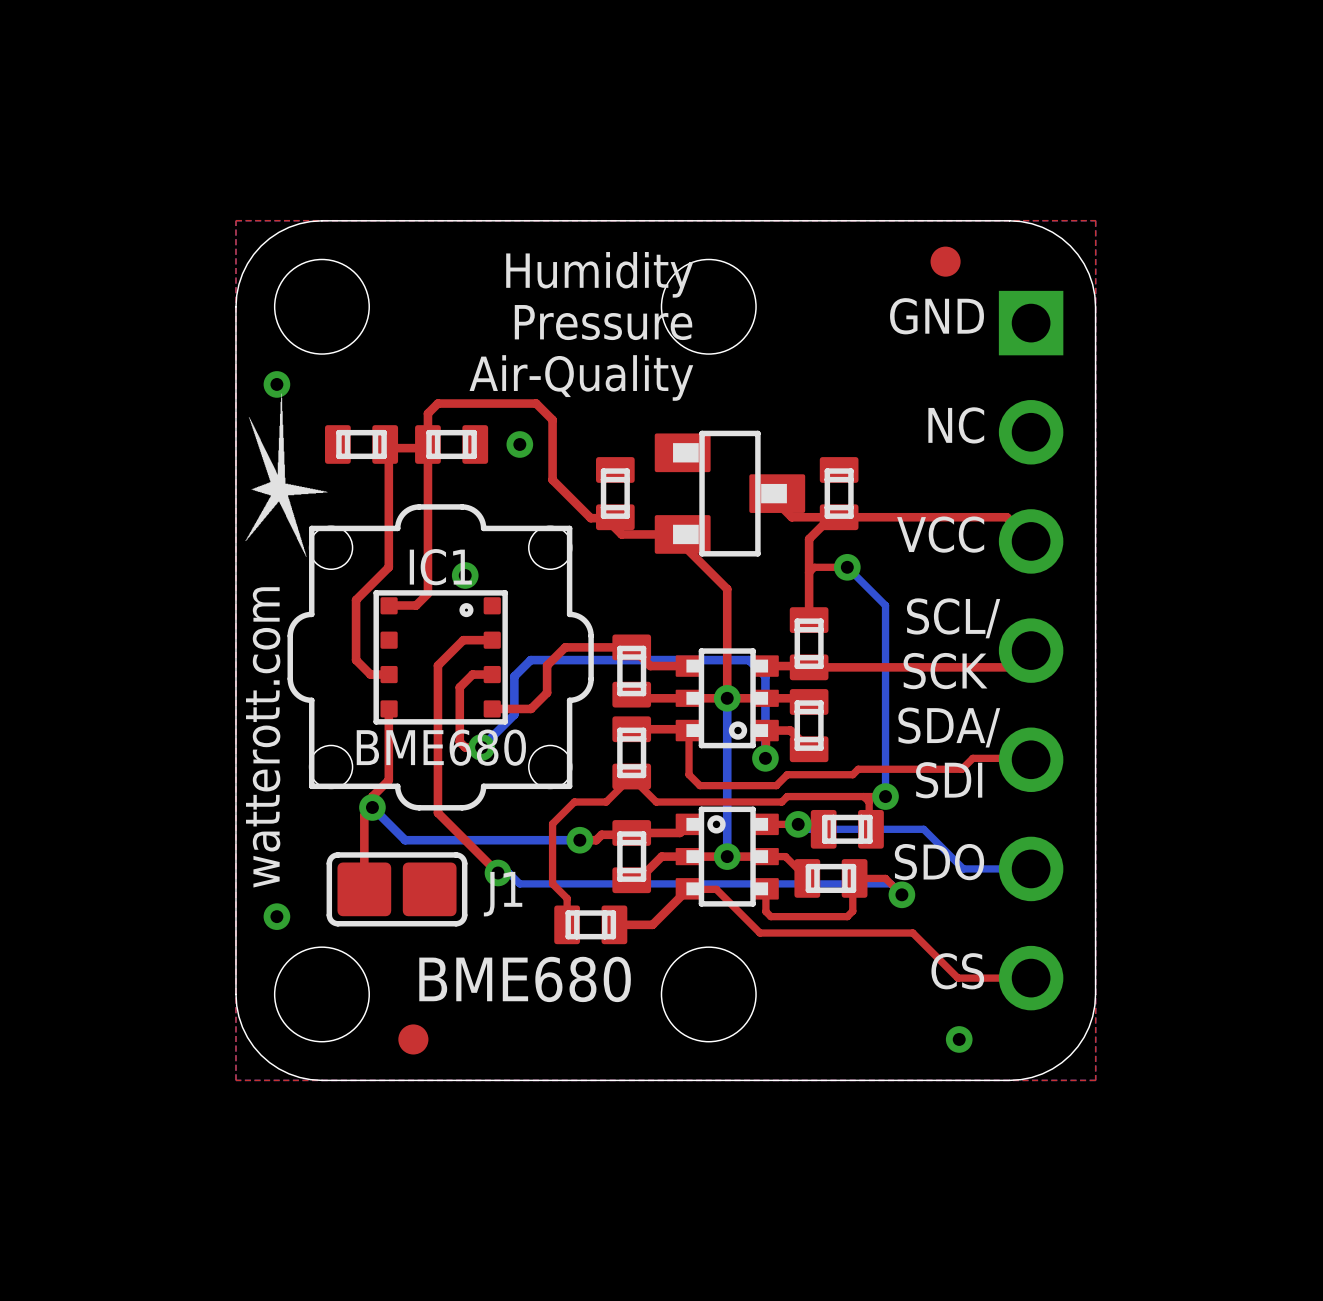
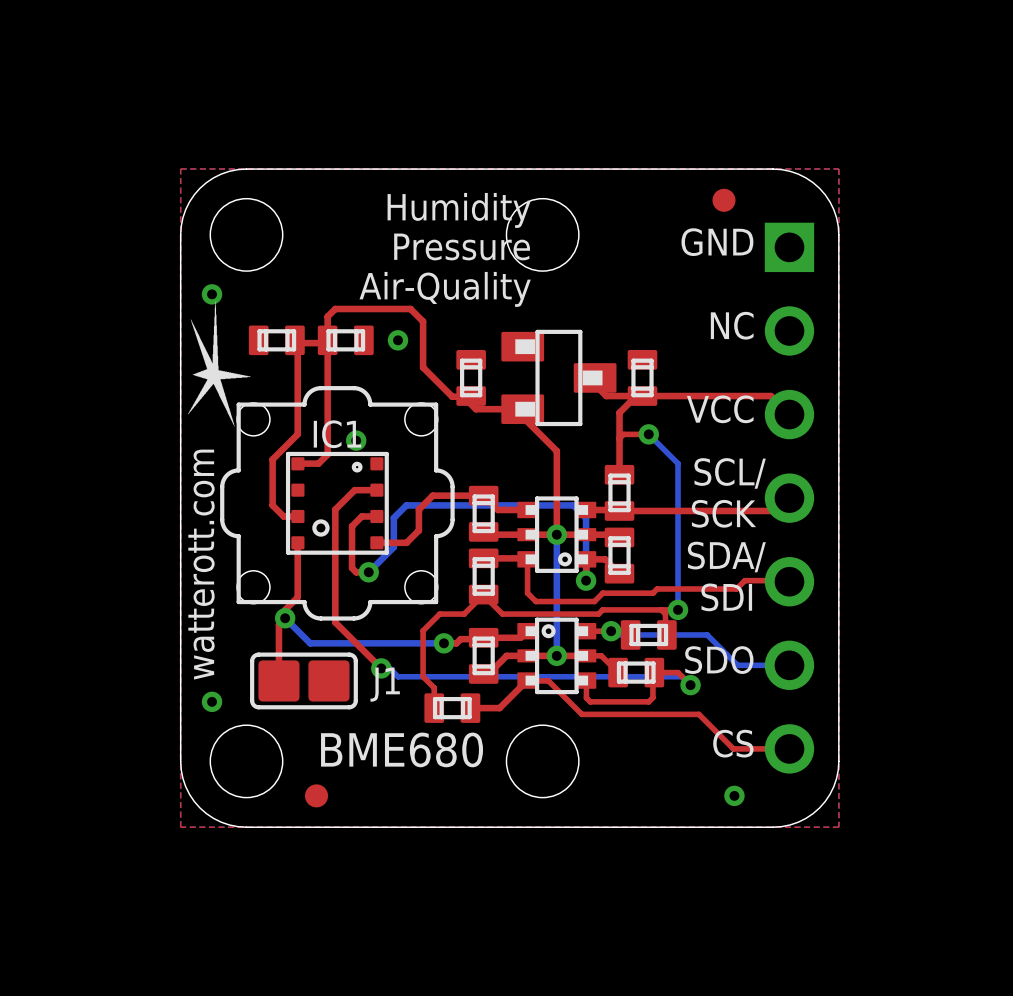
IC1 footprint: [373, 590, 508, 725] -> [285, 451, 389, 555]
IC1 value: BME680 (441, 747) -> none

